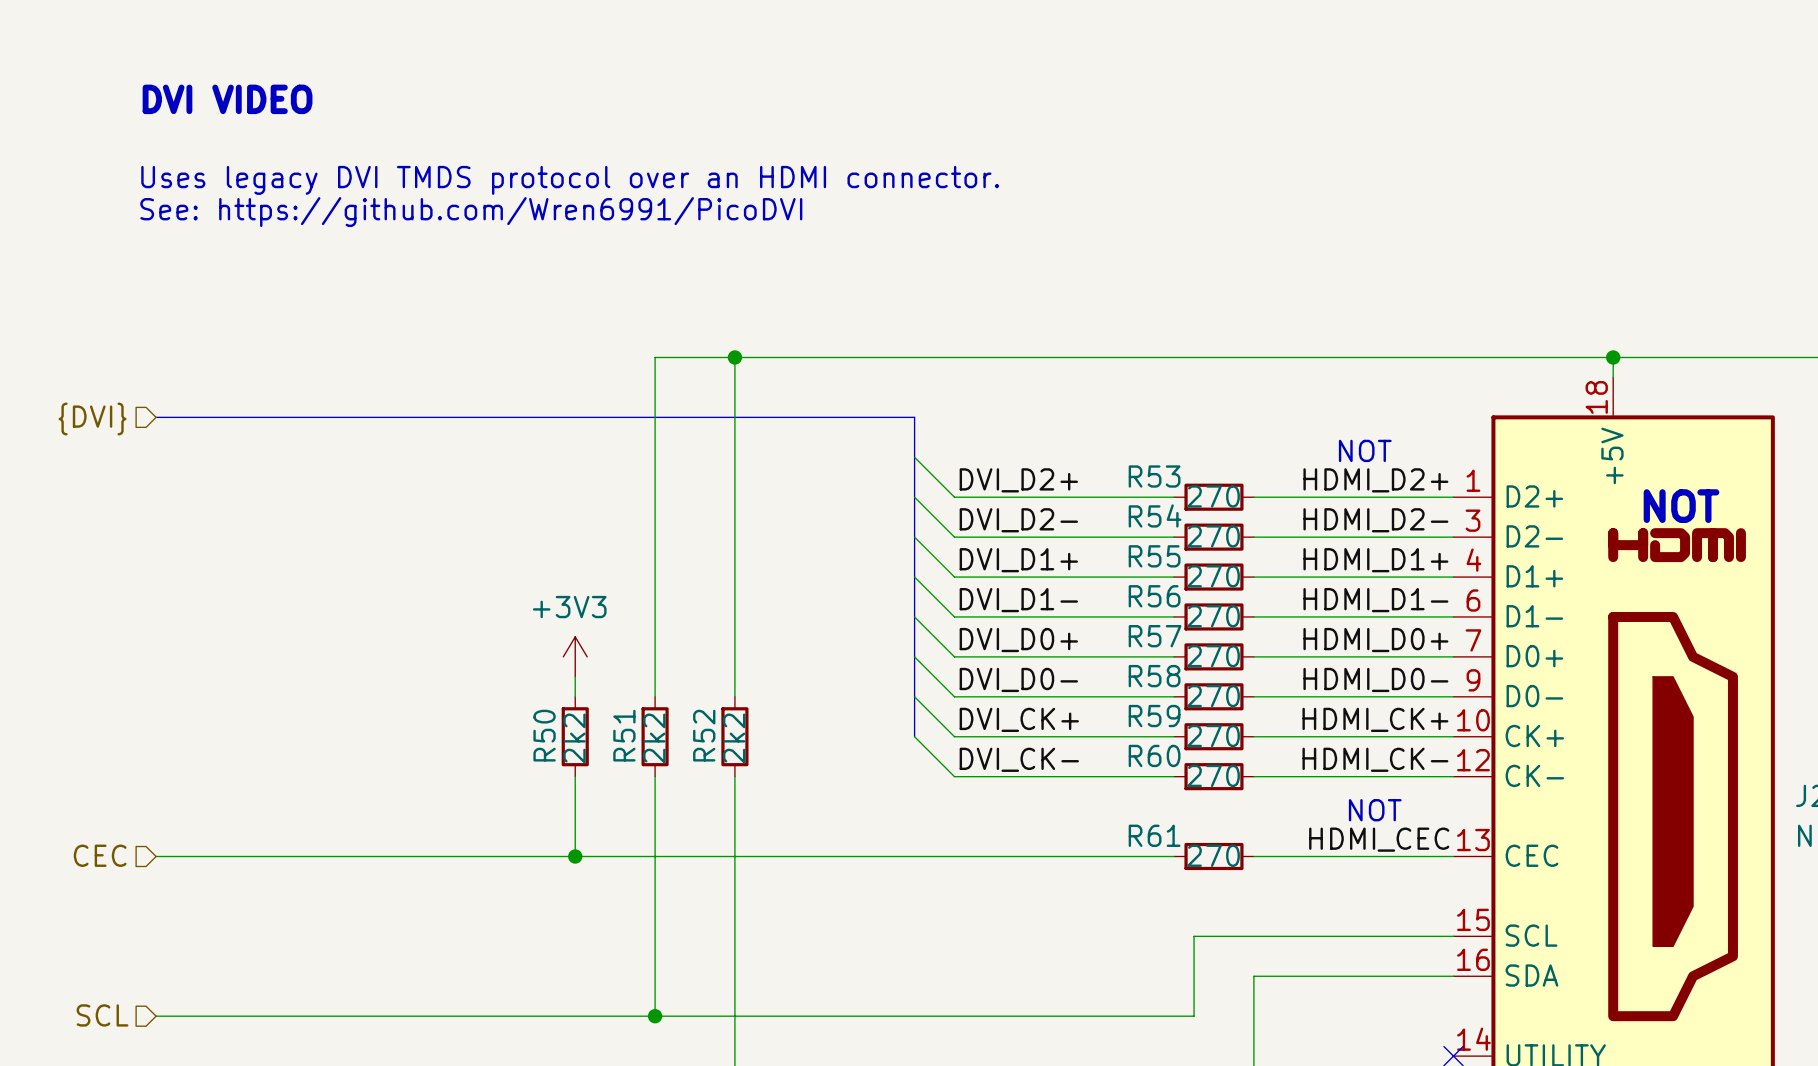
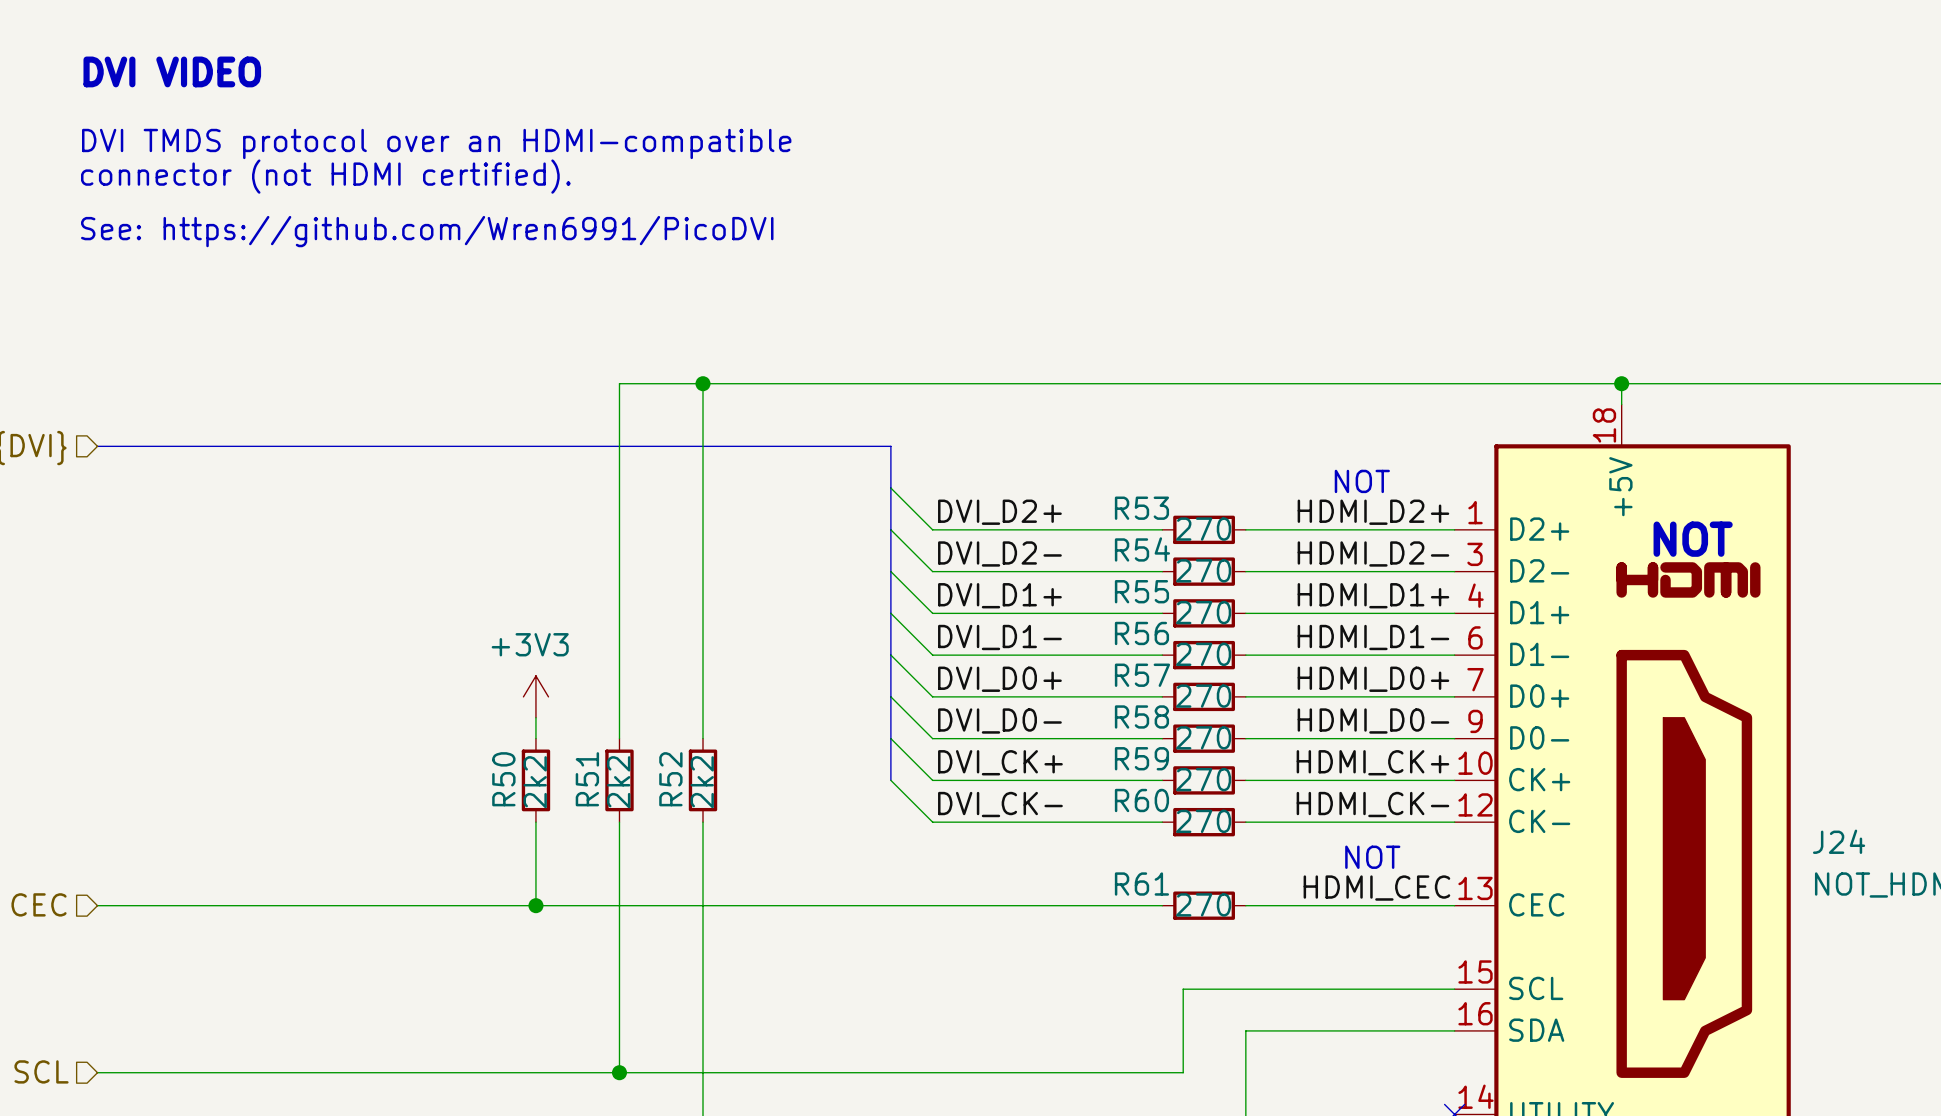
text position: DVI VIDEO (227, 99) -> DVI VIDEO (172, 71)
text: none -> DVI TMDS protocol over an HDMI-compatible (436, 143)
text: none -> connector (not HDMI certified). (325, 176)
text: Uses legacy DVI TMDS protocol over an HDMI connector. (570, 180) -> none

